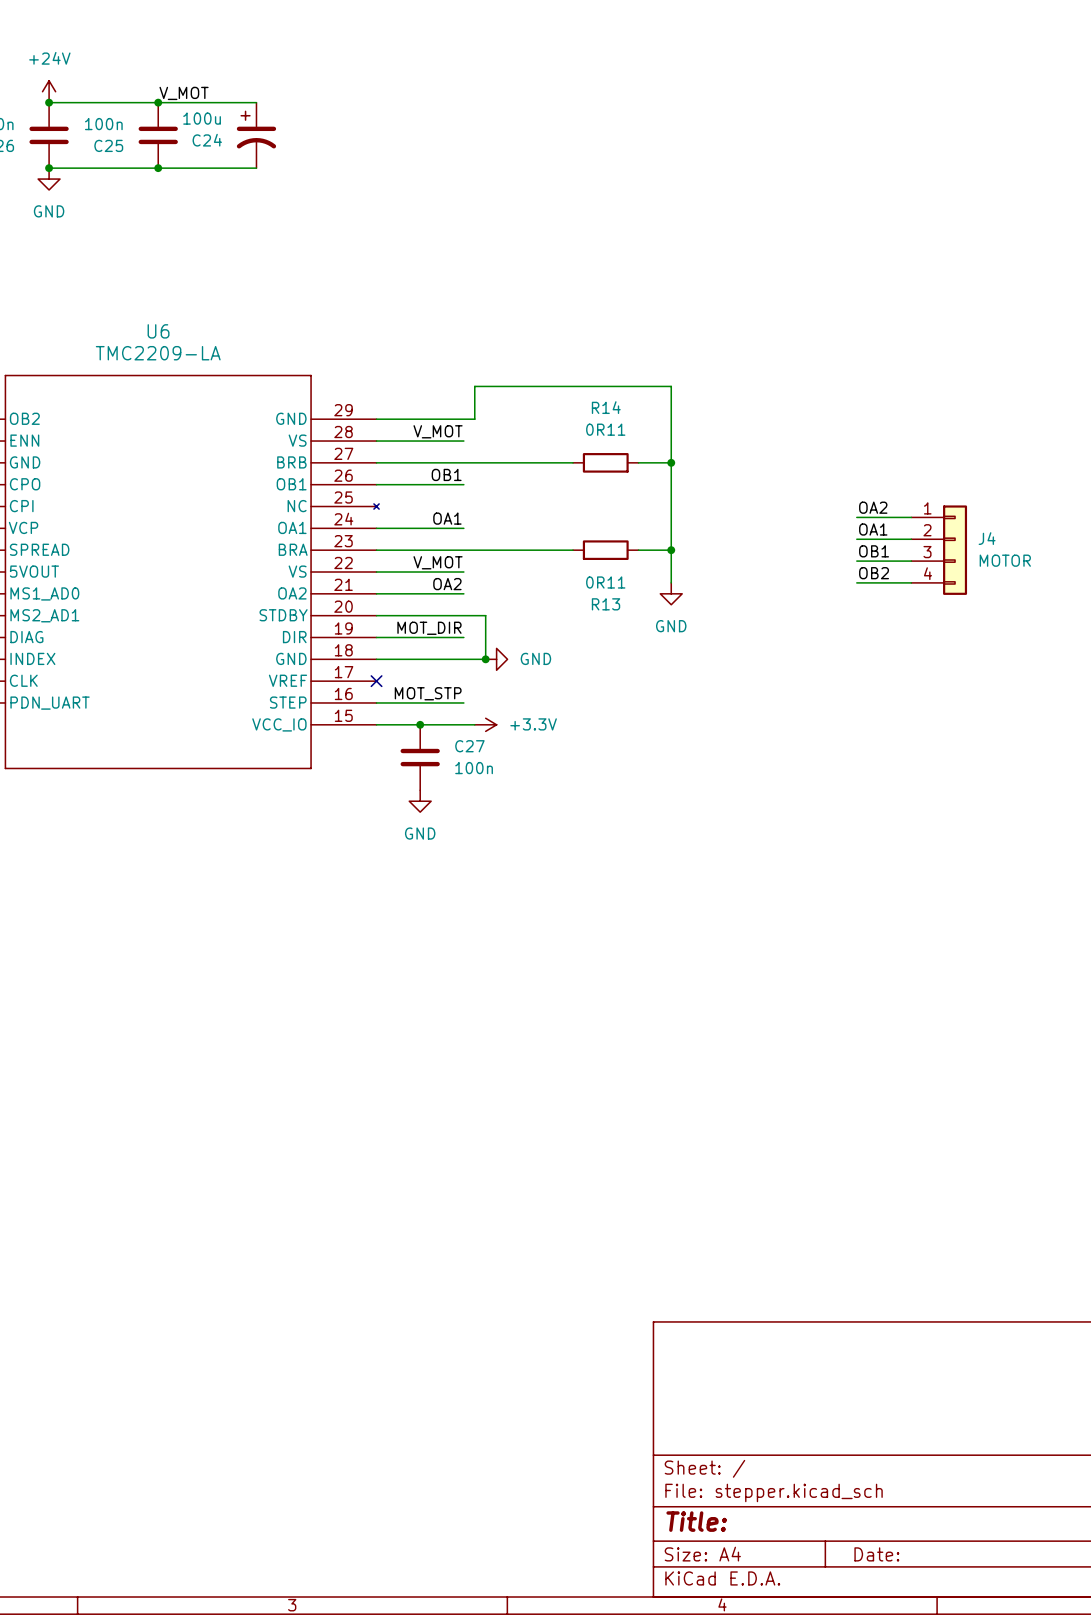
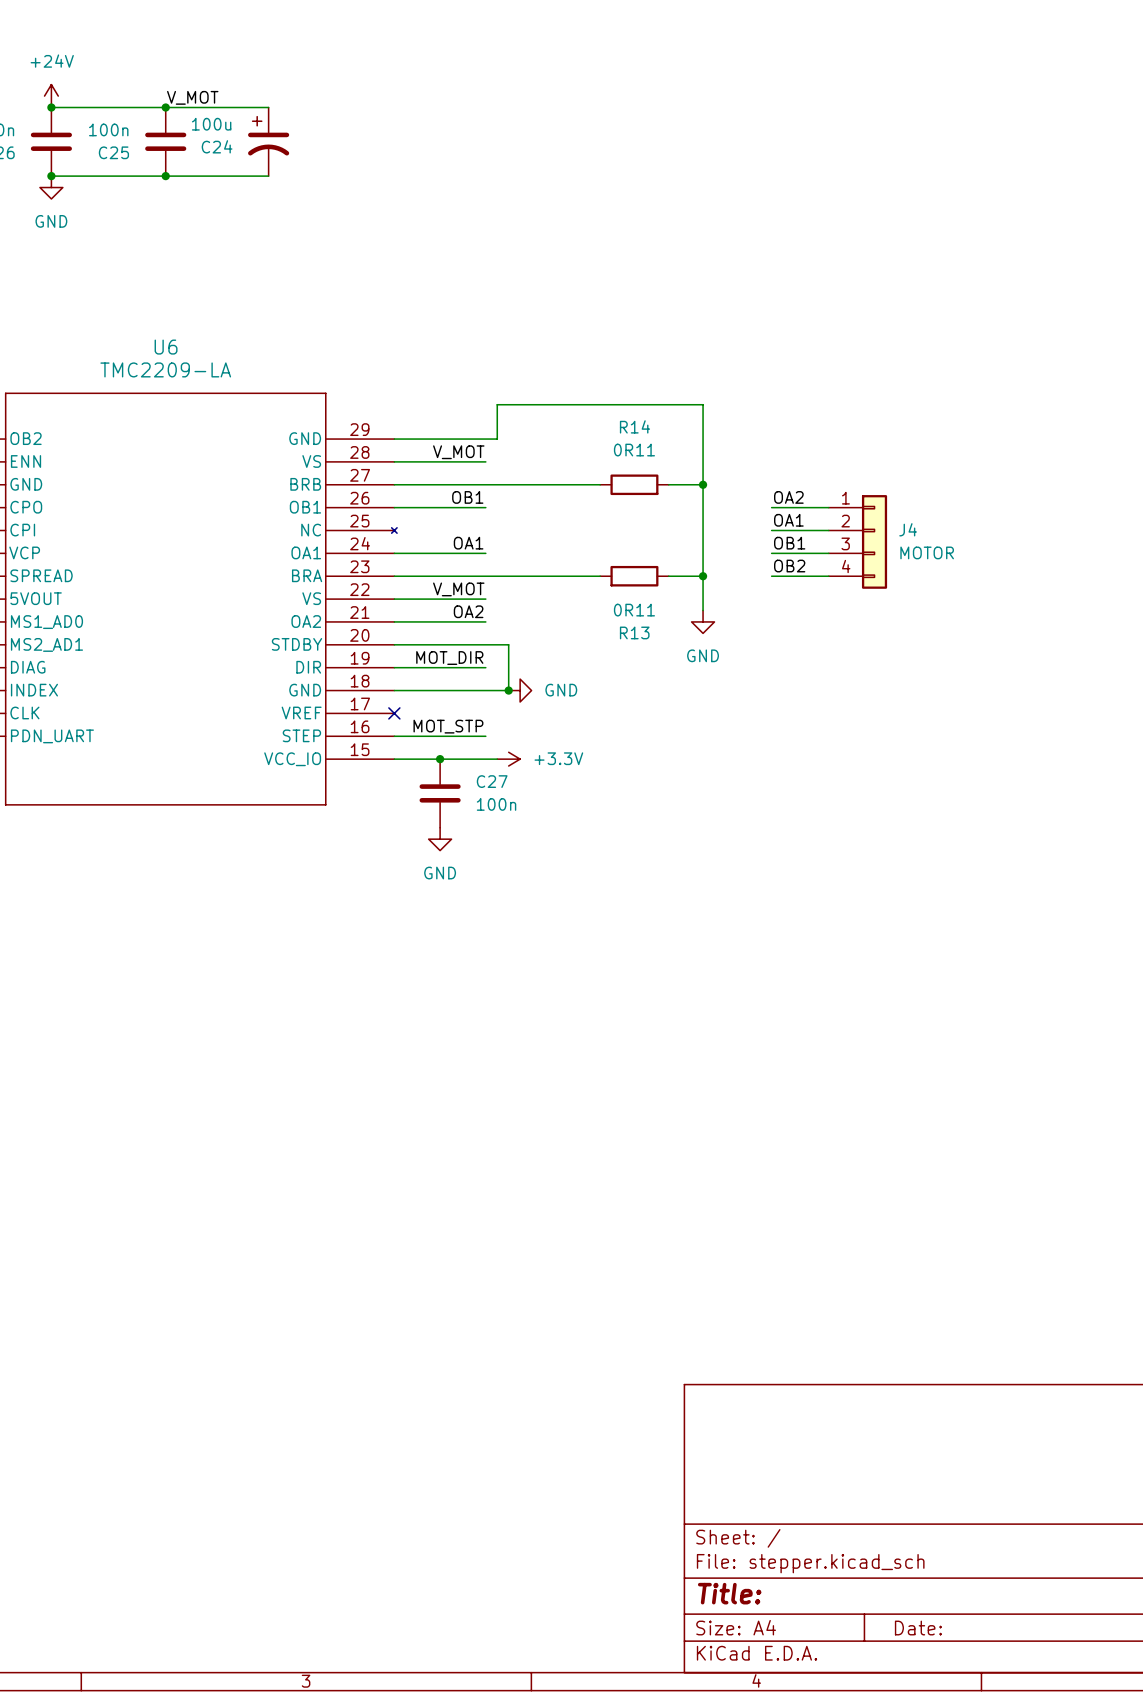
label position: OA2 (873, 507) -> OA2 (788, 497)
wire: (856, 517) (911, 517) -> (771, 530) (828, 530)
label position: OA1 (873, 529) -> OA1 (788, 520)
wire: (856, 539) (911, 539) -> (771, 553) (828, 553)
J4 position: (939, 550) -> (857, 541)
label position: OB1 (874, 551) -> OB1 (789, 543)
wire: (856, 561) (911, 561) -> (771, 576) (828, 576)
label position: OB2 (874, 573) -> OB2 (789, 566)
wire: (856, 582) (911, 582) -> (771, 507) (828, 507)

